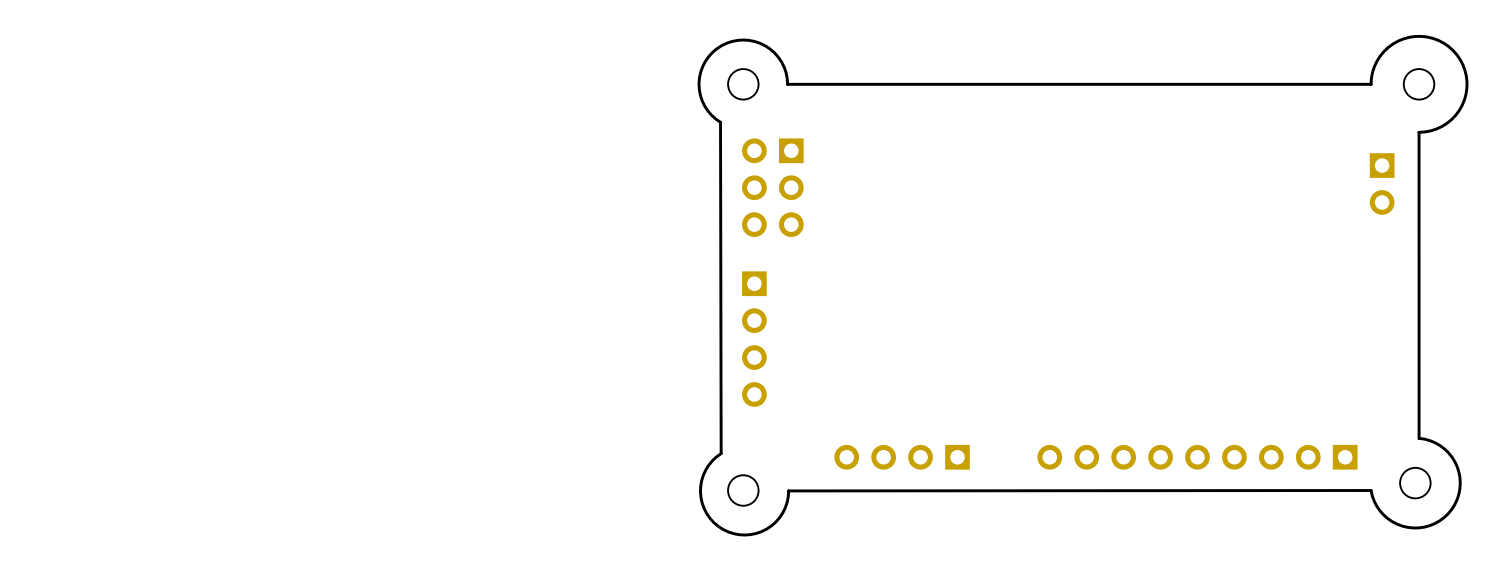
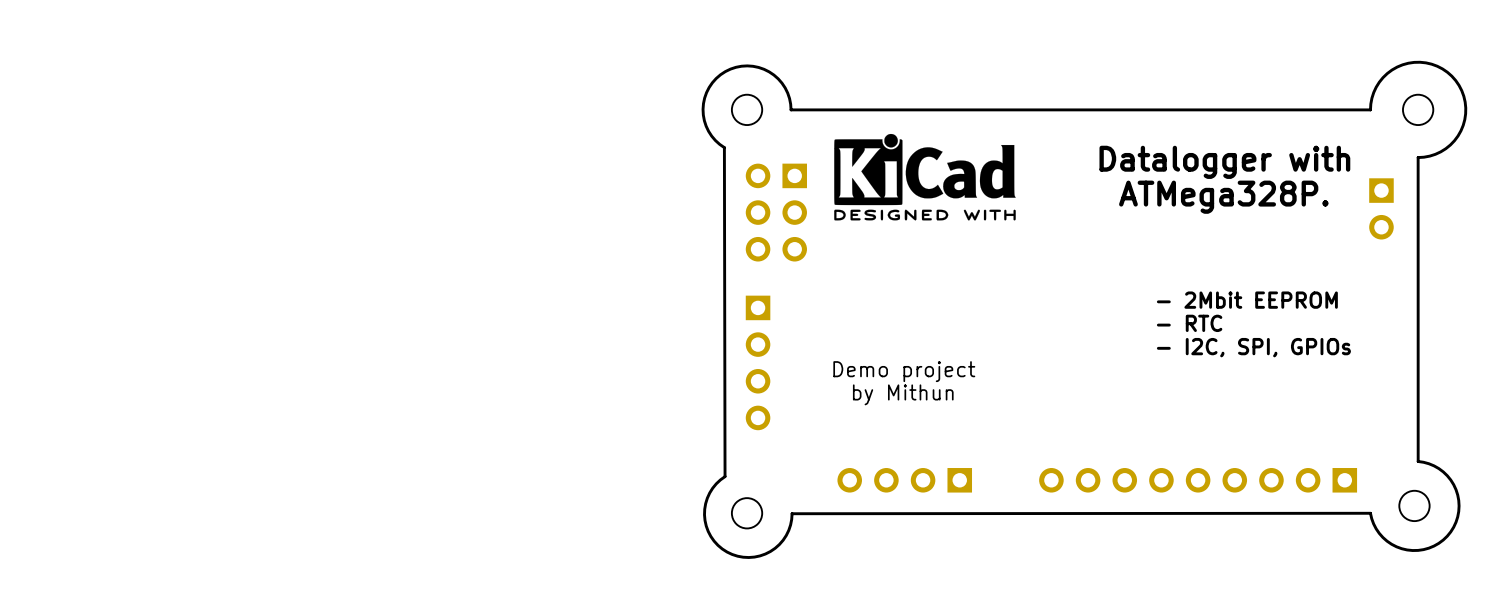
drawing: none -> [834, 133, 1016, 221]
text: none -> Datalogger with (1224, 162)
text: none -> ATMega328P. (1223, 197)
text: none -> - 2Mbit EEPROM (1247, 300)
text: none -> - RTC (1189, 323)
text: none -> - I2C, SPI, GPIOs (1253, 347)
text: none -> Demo project (904, 371)
text: none -> by Mithun (903, 394)

